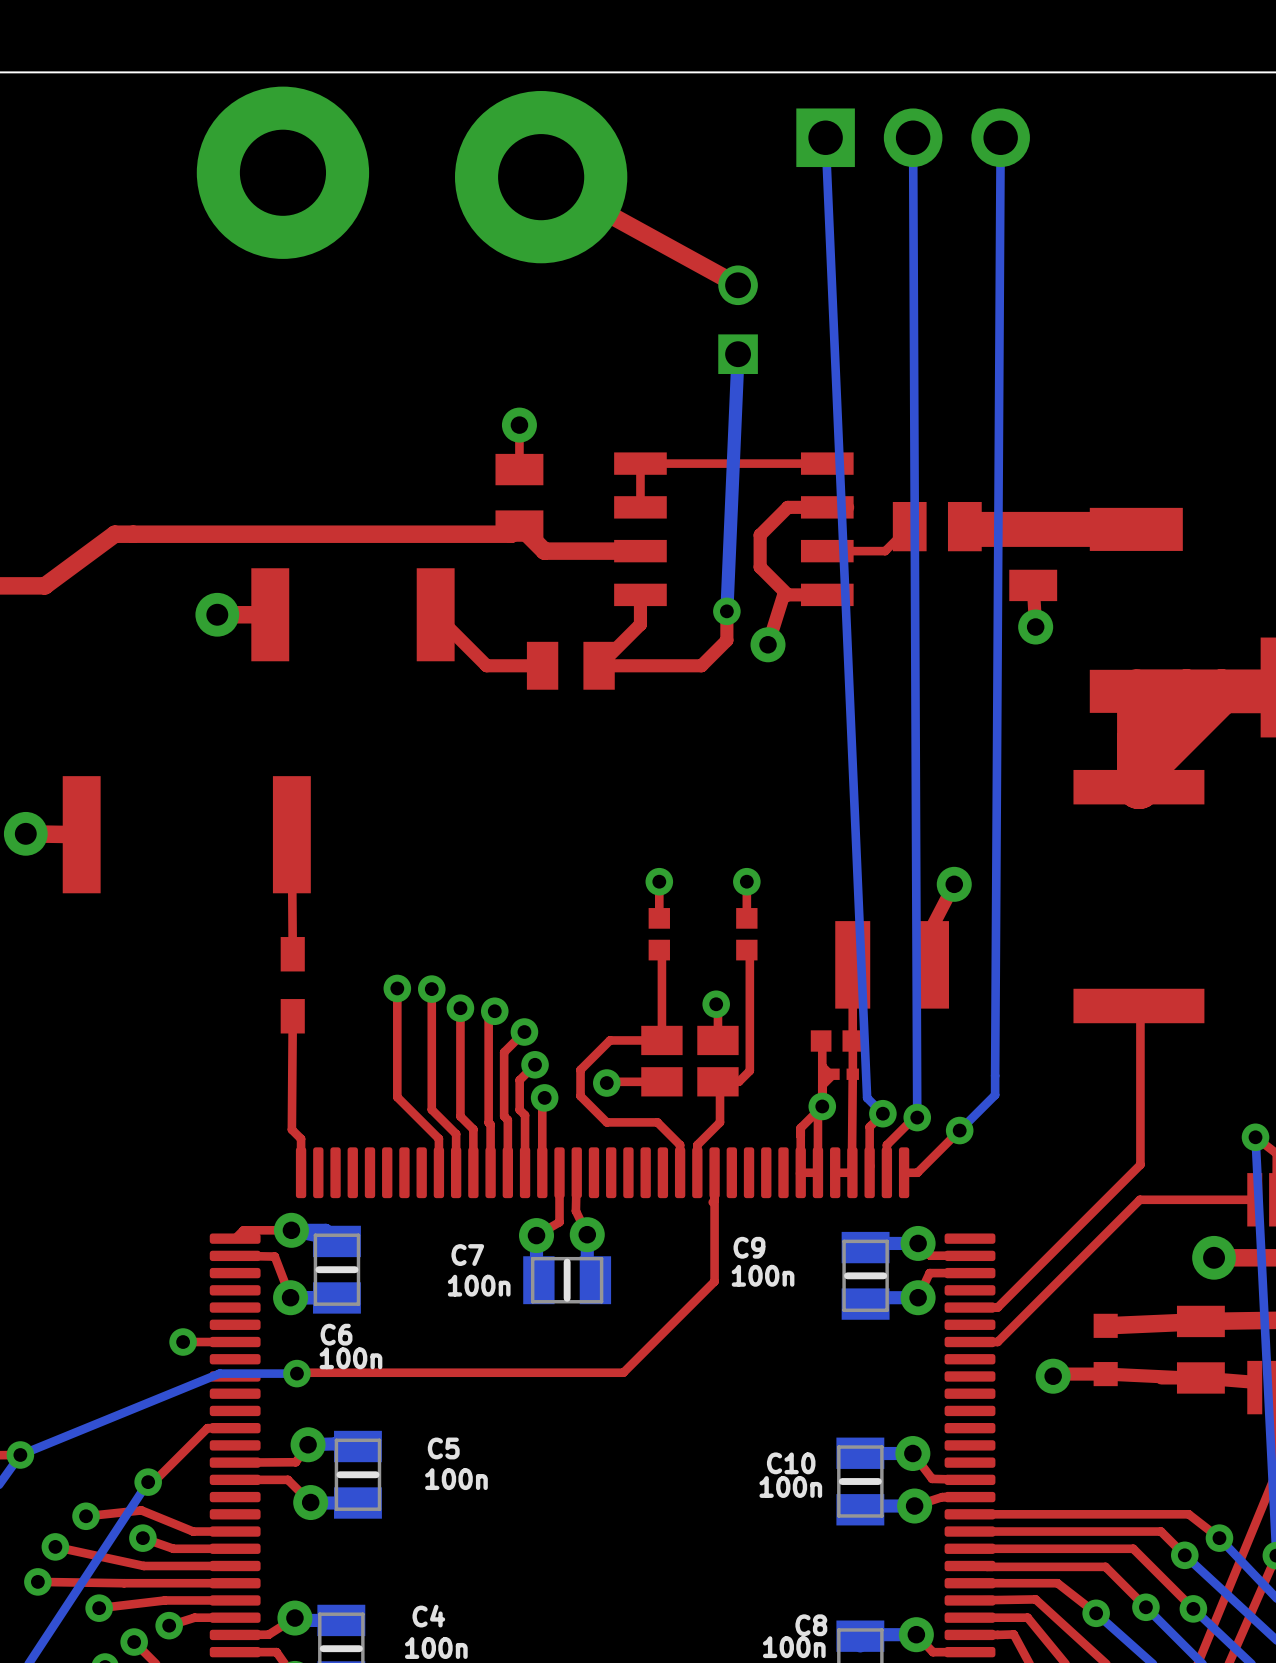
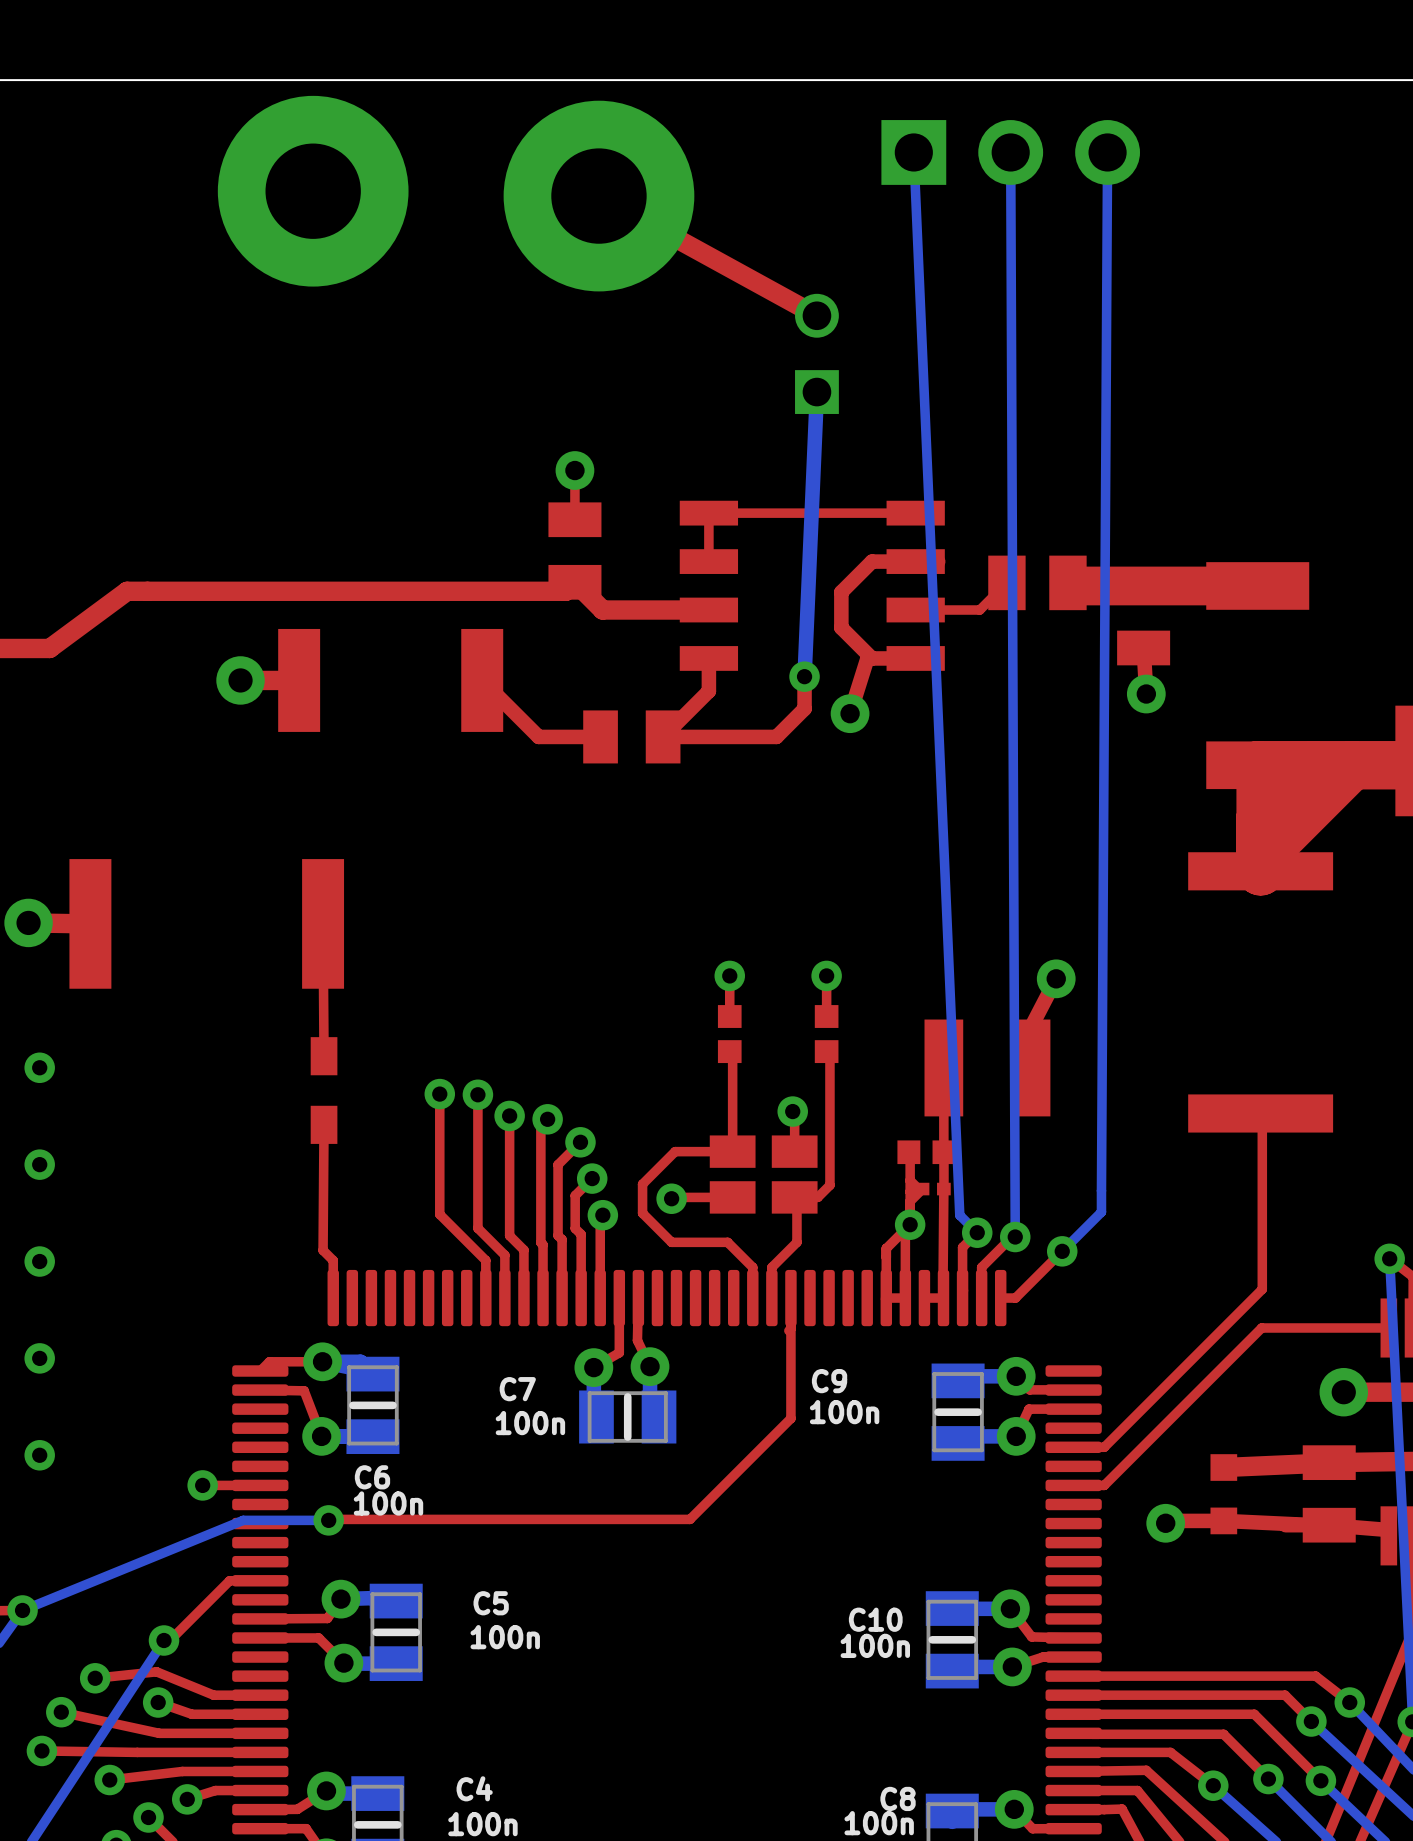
via: none -> (39, 1067)
via: none -> (39, 1164)
via: none -> (39, 1261)
via: none -> (39, 1358)
via: none -> (39, 1455)

